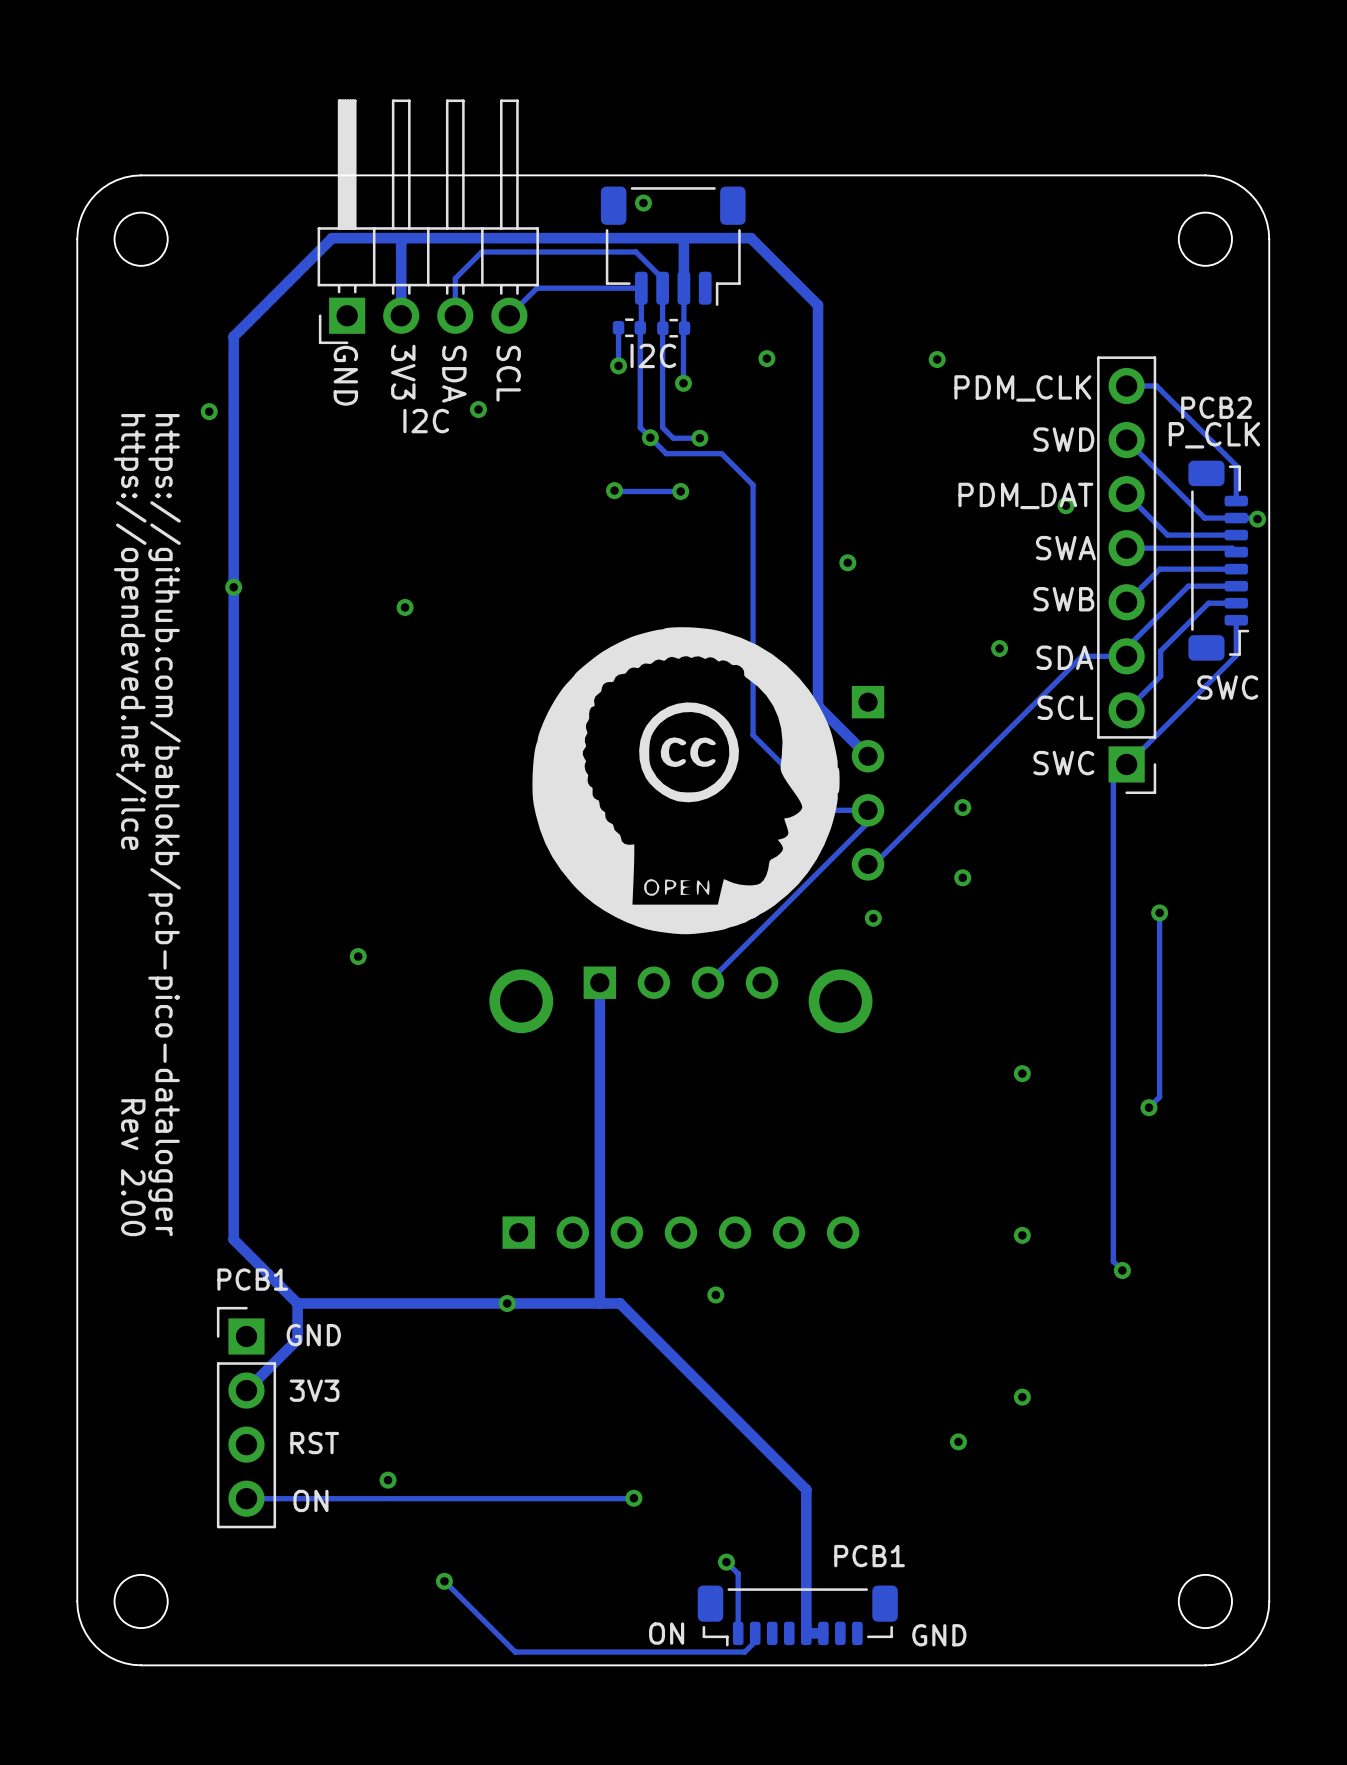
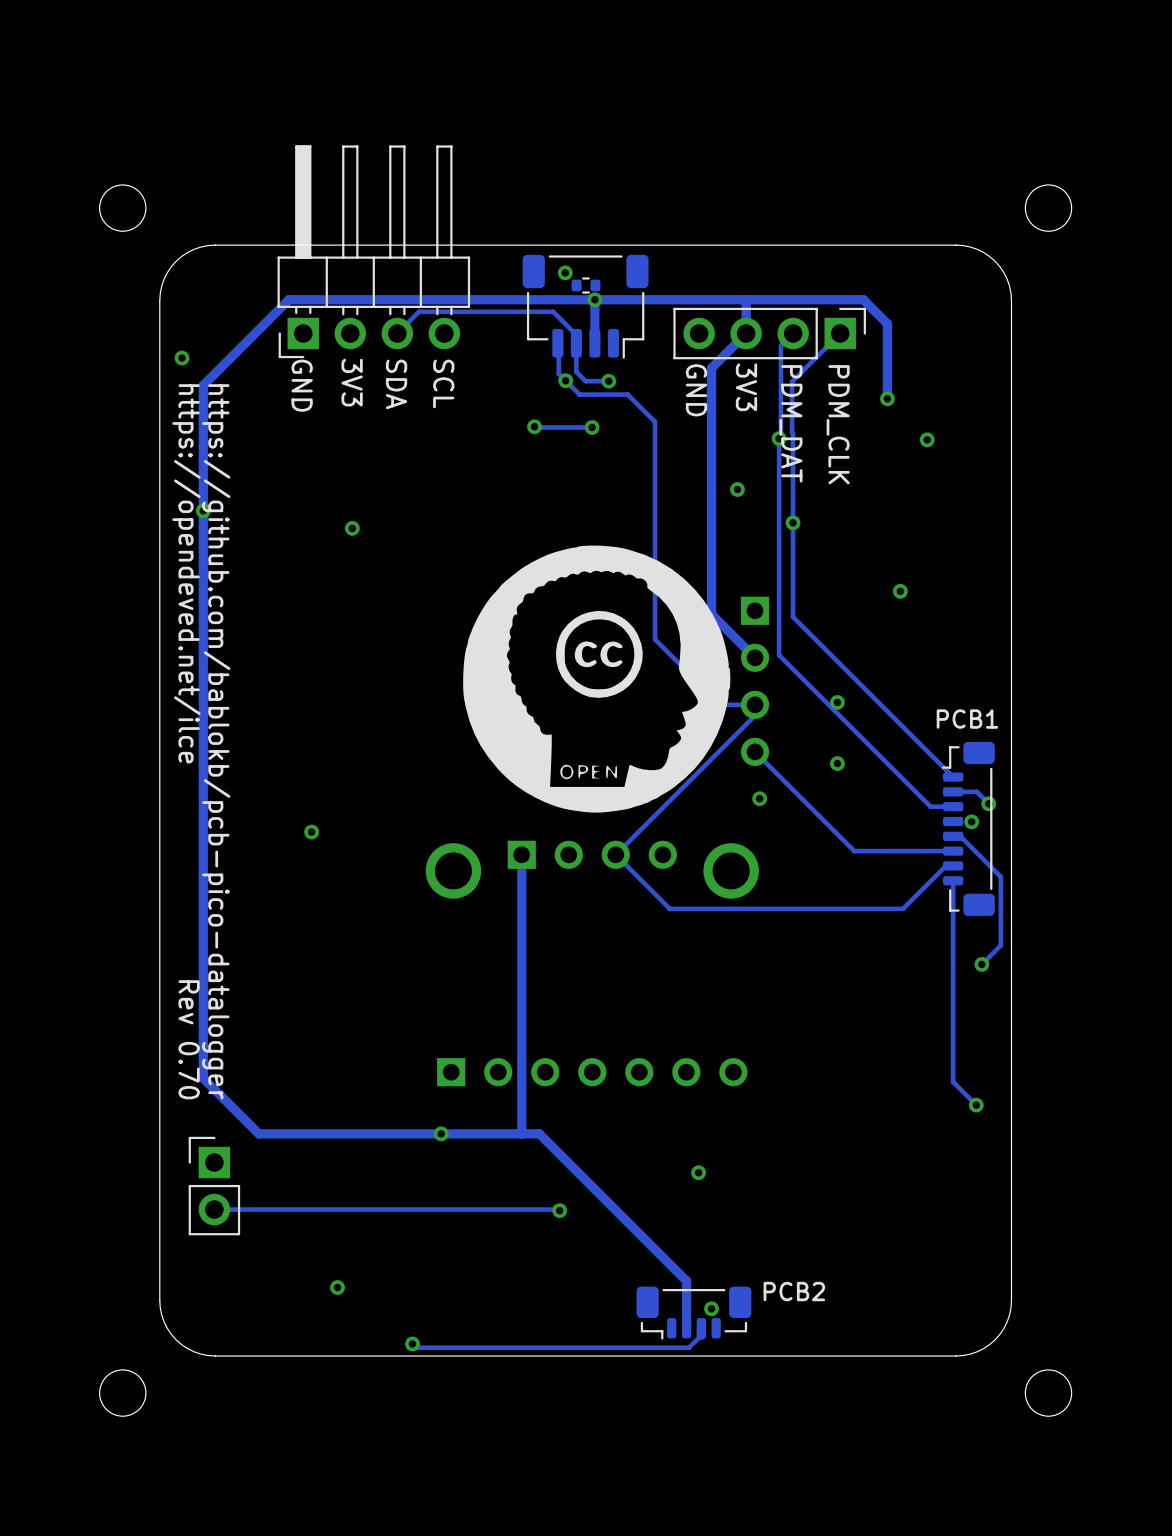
board edge: (1205, 175) (141, 175) (124, 177) (109, 183) (90, 200) (82, 214) (77, 239) (77, 1601) (82, 1625) (90, 1640) (102, 1652) (124, 1663) (141, 1665) (1205, 1665) (1229, 1660) (1244, 1652) (1256, 1640) (1267, 1618) (1269, 1601) (1269, 239) (1264, 214) (1250, 194) (1229, 180) (1205, 175) -> (955, 245) (977, 249) (995, 261) (1007, 279) (1011, 300) (1011, 1300) (1009, 1314) (1000, 1334) (989, 1344) (977, 1351) (955, 1356) (215, 1356) (194, 1351) (181, 1344) (171, 1334) (164, 1321) (159, 1300) (159, 300) (161, 286) (171, 266) (181, 256) (194, 249) (215, 245) (955, 245)
via: (643, 203) -> none
part position: (428, 221) -> (373, 251)
track: (402, 238) (401, 315) -> none
track: (683, 238) (332, 238) (233, 336) (233, 443) -> (887, 398) (887, 323) (863, 299) (288, 299) (203, 385)
track: (684, 238) (750, 238) (818, 305) (818, 423) -> (744, 299) (746, 333) (711, 368)
track: (683, 239) (683, 286) -> none
part position: (673, 246) -> (585, 306)
track: (662, 278) (635, 252) (481, 252) (455, 278) (455, 315) -> none
track: (662, 288) (662, 385) -> (397, 333) (419, 311) (553, 311) (576, 334)
track: (683, 288) (683, 383) -> none
via: none -> (565, 272)
track: (509, 315) (536, 288) (641, 288) (640, 427) (642, 429) -> (557, 343) (558, 373)
track: (618, 327) (618, 365) -> none
part: (629, 327) -> none
via: none -> (594, 299)
track: none -> (595, 299) (595, 342)
text: I2C (653, 355) -> none
via: (766, 358) -> none
via: (937, 359) -> none
via: (618, 365) -> none
text position: 3V3 (403, 372) -> 3V3 (352, 382)
text position: SCL (508, 373) -> SCL (443, 383)
text position: SDA (454, 374) -> SDA (396, 384)
text position: GND (345, 375) -> GND (302, 385)
via: (683, 383) -> none
part: none -> (769, 333)
track: none -> (793, 333) (780, 345) (779, 655) (930, 806) (953, 806)
track: none -> (840, 333) (792, 381) (793, 616) (953, 777)
track: (1126, 385) (1156, 385) (1236, 465) (1236, 501) -> none
text rotation: 0° (1022, 388) -> 90° clockwise (838, 424)
text: PCB2 (1216, 407) -> none
via: (478, 409) -> none
text: I2C (426, 421) -> none
text: P_CLK (1214, 435) -> none
text: SWD (1063, 439) -> none
track: (1126, 440) (1204, 518) (1257, 519) -> none
text: none -> 3V3 (746, 387)
text: none -> GND (696, 390)
via: none -> (887, 398)
track: (1126, 494) (1167, 535) (1236, 535) -> none
text rotation: 0° (1025, 495) -> 90° clockwise (790, 423)
via: none -> (779, 438)
via: (1257, 519) -> none
text: SWA (1065, 548) -> none
track: (1126, 548) (1232, 548) (1236, 552) -> none
part: (1218, 560) -> none
track: (1236, 569) (1159, 569) (1126, 602) -> none
part: (1126, 575) -> none
track: (1236, 586) (1188, 586) (1126, 647) (1126, 656) (1082, 656) (873, 864) (868, 864) -> (953, 851) (854, 851) (755, 751)
text: SWB (1063, 599) -> none
via: none -> (793, 522)
track: (1236, 603) (1208, 603) (1160, 651) (1160, 676) (1126, 710) -> none
track: (1236, 620) (1236, 655) (1113, 777) (1113, 1261) -> (953, 880) (953, 1082) (968, 1097)
via position: (999, 648) -> (900, 591)
text: SDA (1064, 657) -> none
text: SWC (1227, 687) -> none
text: SCL (1065, 707) -> none
text: SWC (1063, 763) -> none
text: https://opendeved.net/ilce Rev 2.00 (130, 825) -> none
text position: https://github.com/bablokb/pcb-pico-datalogger (164, 825) -> https://github.com/bablokb/pcb-pico-datalogger (216, 741)
text: none -> PCB1 (967, 719)
text: none -> https://opendeved.net/ilce Rev 0.70 (186, 741)
track: none -> (953, 791) (976, 791) (988, 803)
track: (1159, 912) (1159, 1097) (1148, 1107) -> none
via position: (1159, 912) -> (988, 803)
via: none -> (971, 821)
part: none -> (968, 828)
track: none -> (953, 836) (960, 836) (1000, 876) (1000, 945) (981, 964)
track: none -> (615, 854) (669, 908) (903, 908) (946, 865) (953, 865)
via: (1022, 1073) -> none
via position: (1148, 1107) -> (981, 964)
via: (1022, 1235) -> none
text: PCB1 (252, 1279) -> none
via: (715, 1294) -> none
track: (297, 1303) (297, 1339) (246, 1390) -> (559, 1210) (214, 1209)
text: GND (313, 1335) -> none
via: none -> (698, 1172)
part: none -> (214, 1186)
text: 3V3 (314, 1390) -> none
via: none -> (559, 1210)
via: (1022, 1397) -> none
part: (246, 1417) -> none
via: (958, 1441) -> none
text: RST (314, 1443) -> none
track: (789, 1472) (806, 1489) (806, 1526) -> (686, 1281) (686, 1328)
text: none -> PCB2 (794, 1291)
track: (633, 1498) (246, 1498) -> none
via: (633, 1498) -> none
text: ON (310, 1500) -> none
via: none -> (711, 1308)
part: none -> (693, 1313)
track: (806, 1535) (806, 1633) (823, 1633) -> (701, 1335) (689, 1347) (416, 1347) (412, 1343)
text: PCB1 (869, 1556) -> none
track: (726, 1562) (738, 1573) (738, 1633) -> none
via: (726, 1562) -> none
track: (444, 1581) (515, 1652) (744, 1652) (755, 1641) (755, 1633) -> none
via position: (444, 1581) -> (412, 1343)
part: (797, 1615) -> none
text: ON (666, 1633) -> none
text: GND (939, 1635) -> none

